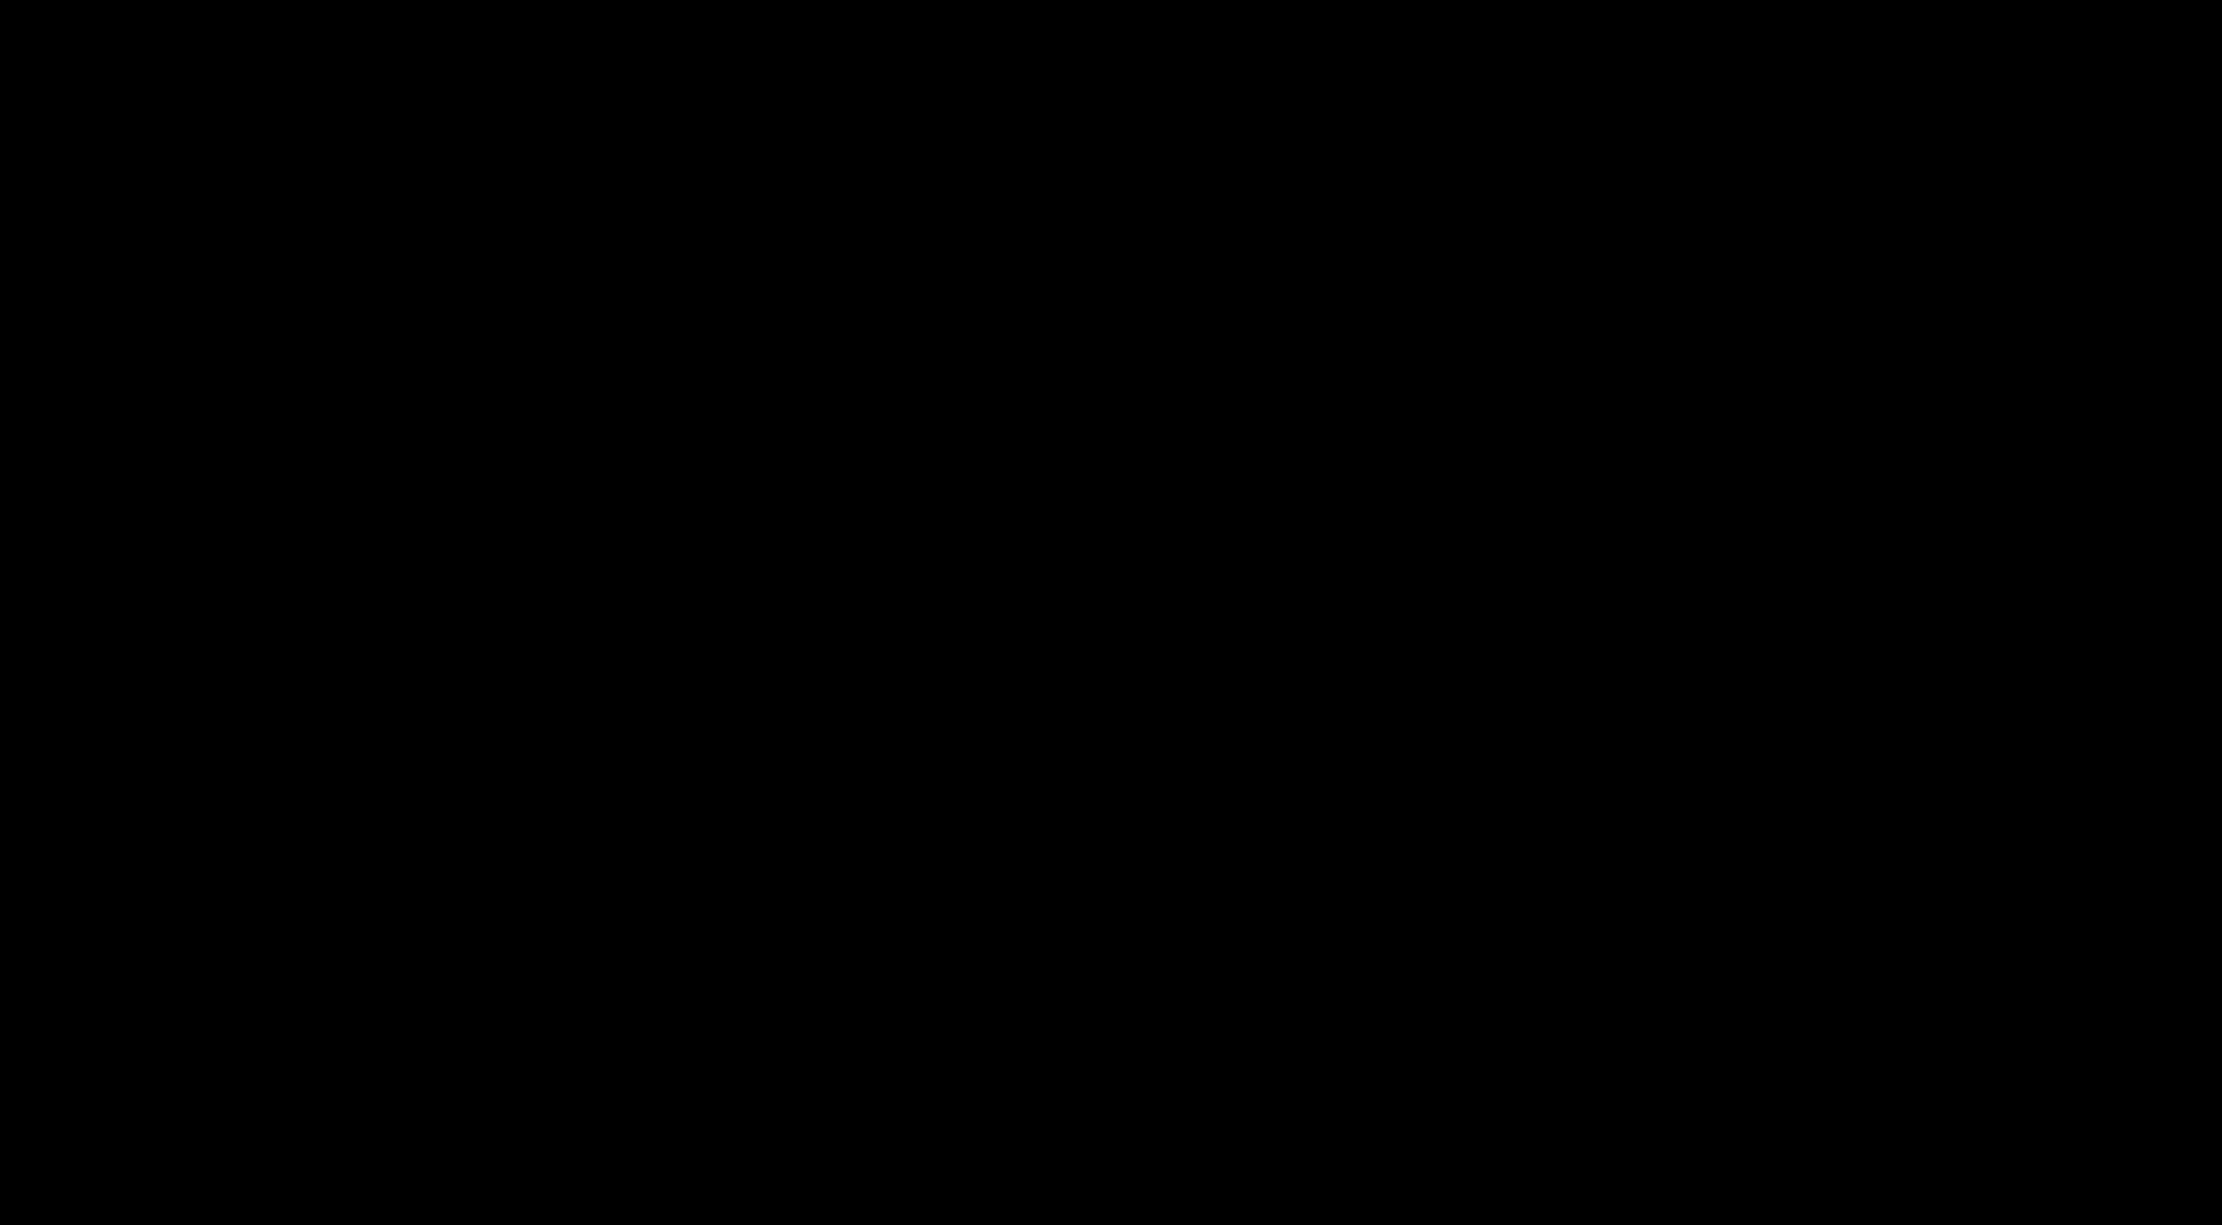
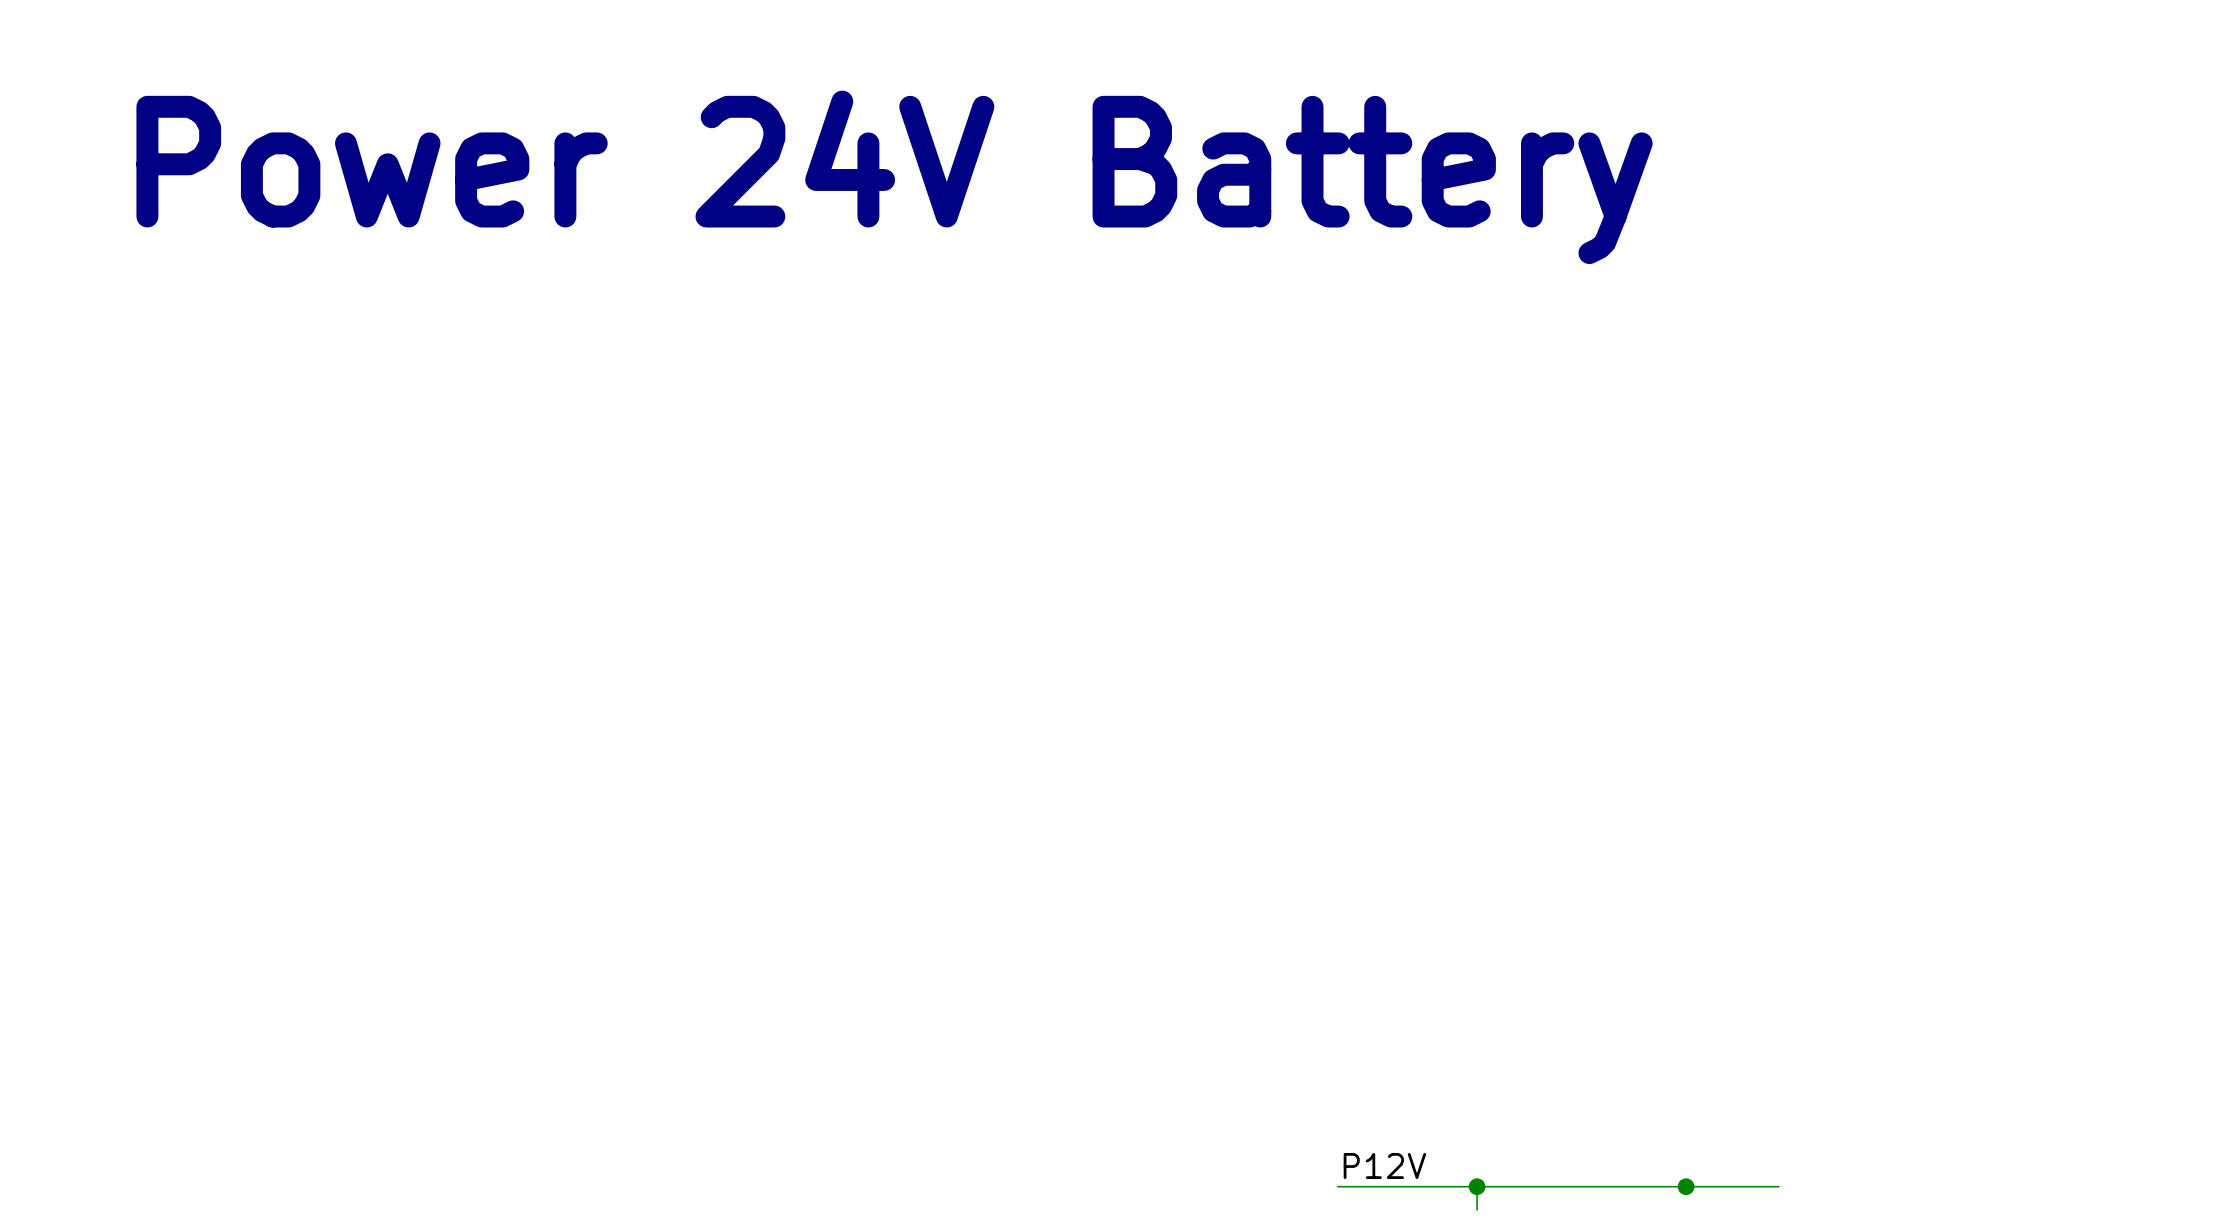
text: none -> Power 24V Battery (894, 177)
label: none -> P12V (1384, 1165)
wire: none -> (1337, 1186) (1778, 1186)
wire: none -> (1477, 1186) (1477, 1209)
junction: none -> (1477, 1186)
junction: none -> (1686, 1186)

